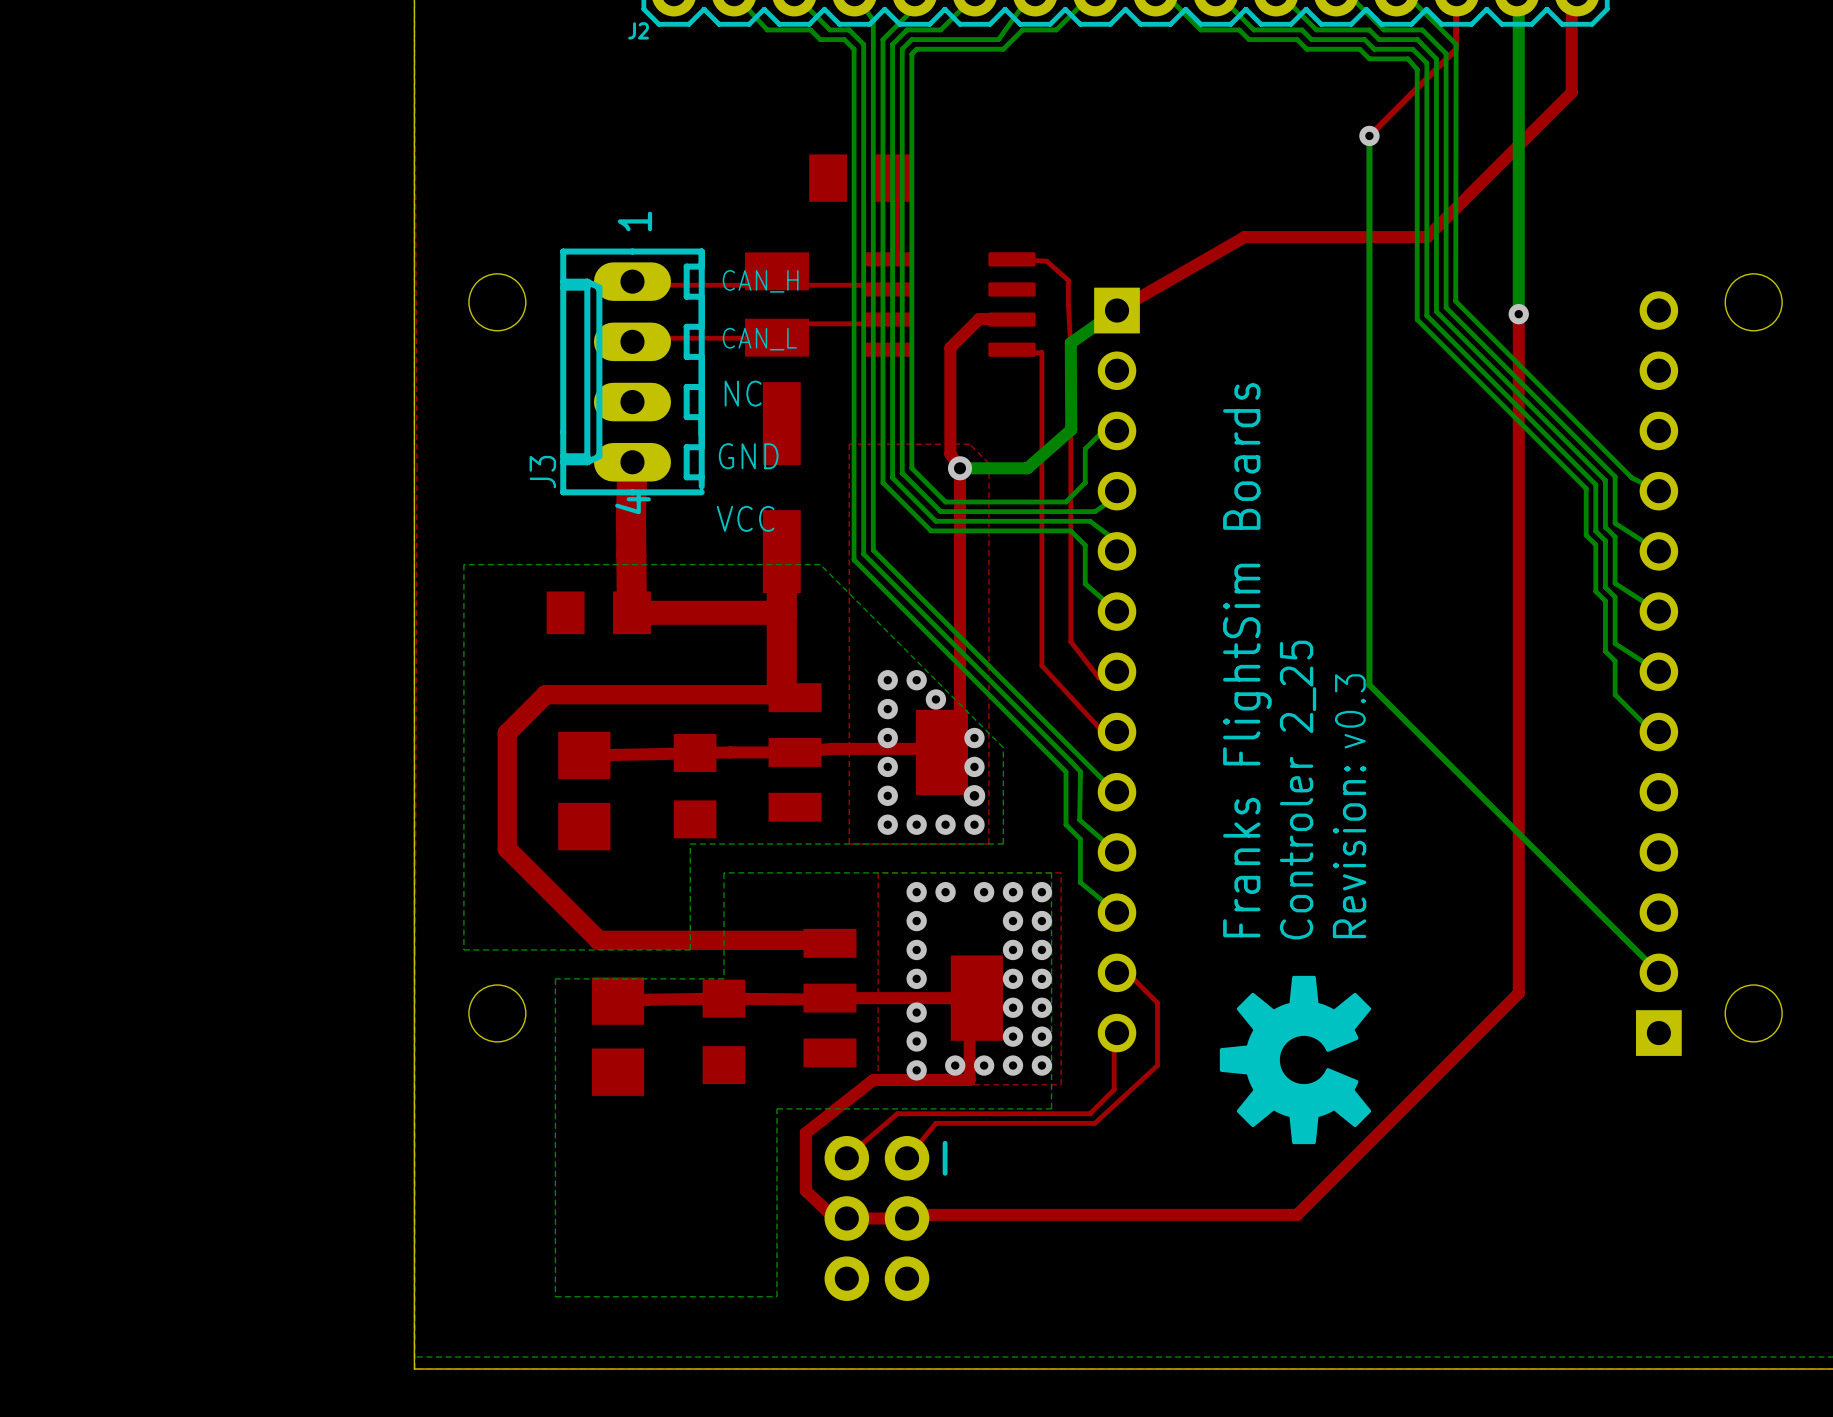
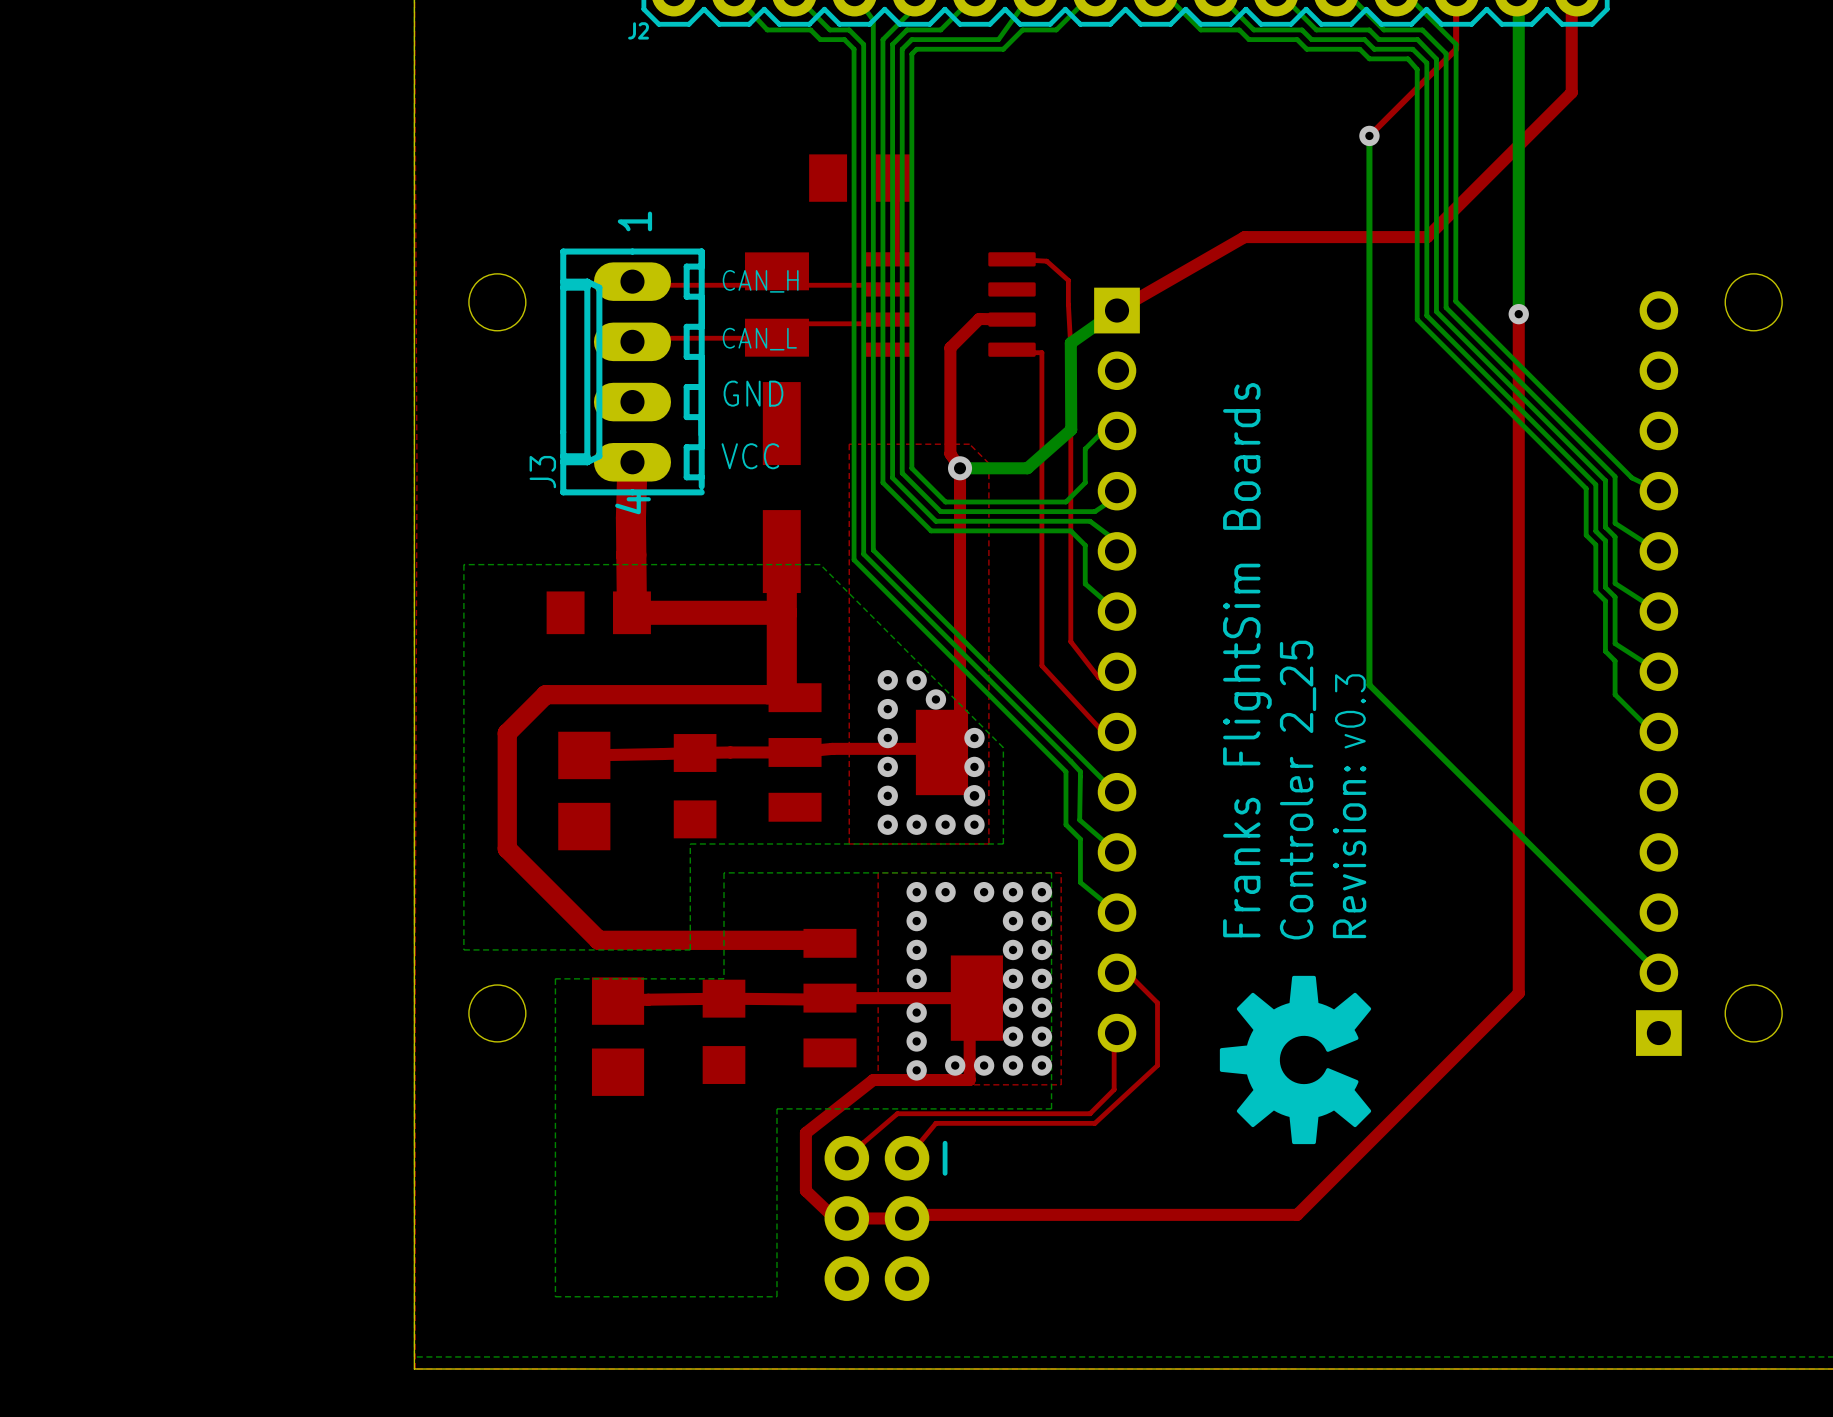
text: NC (743, 393) -> GND (753, 393)
text: GND (748, 456) -> VCC (750, 456)
text: VCC (745, 518) -> none

